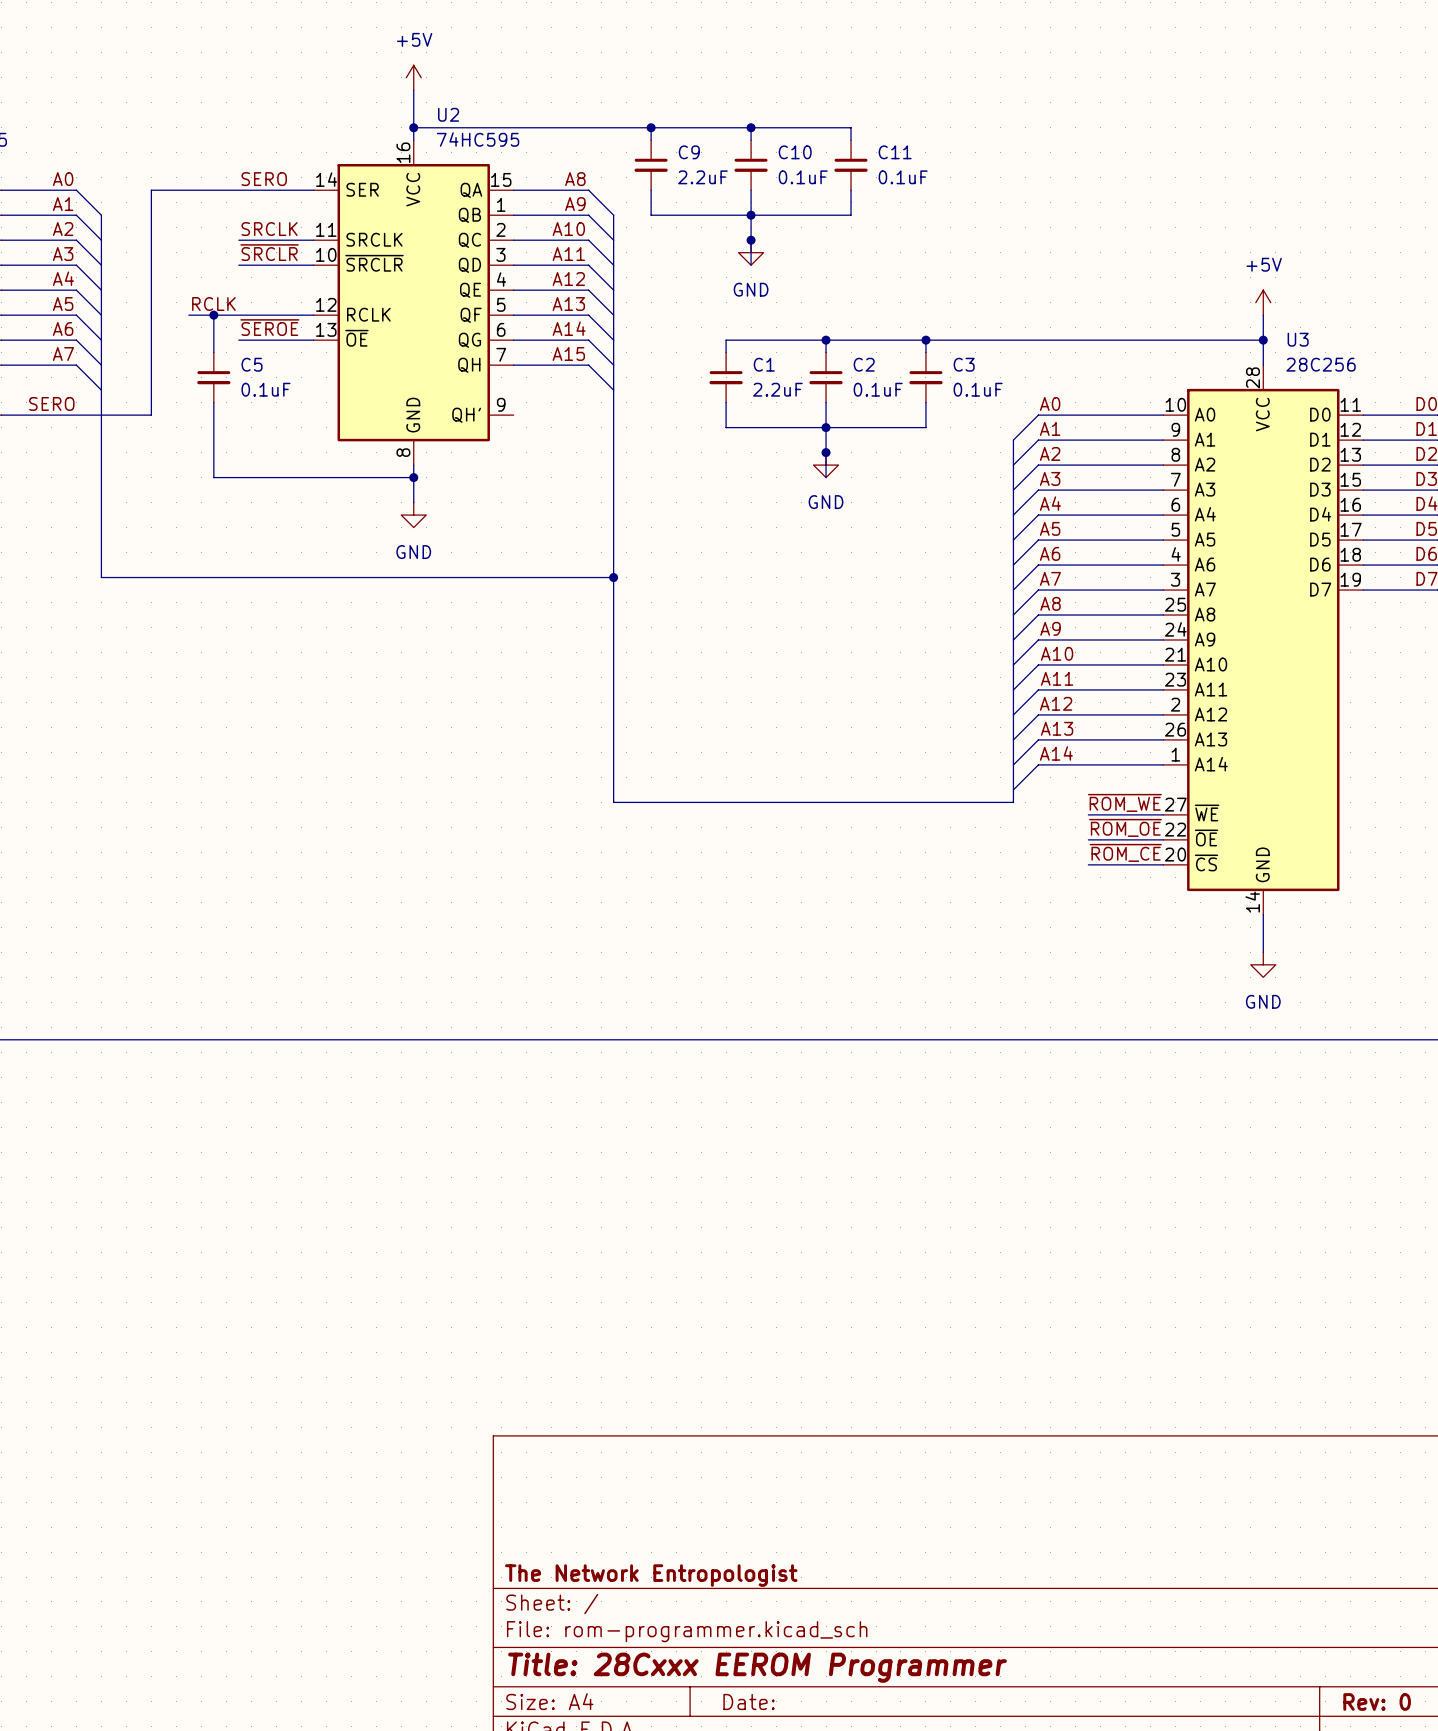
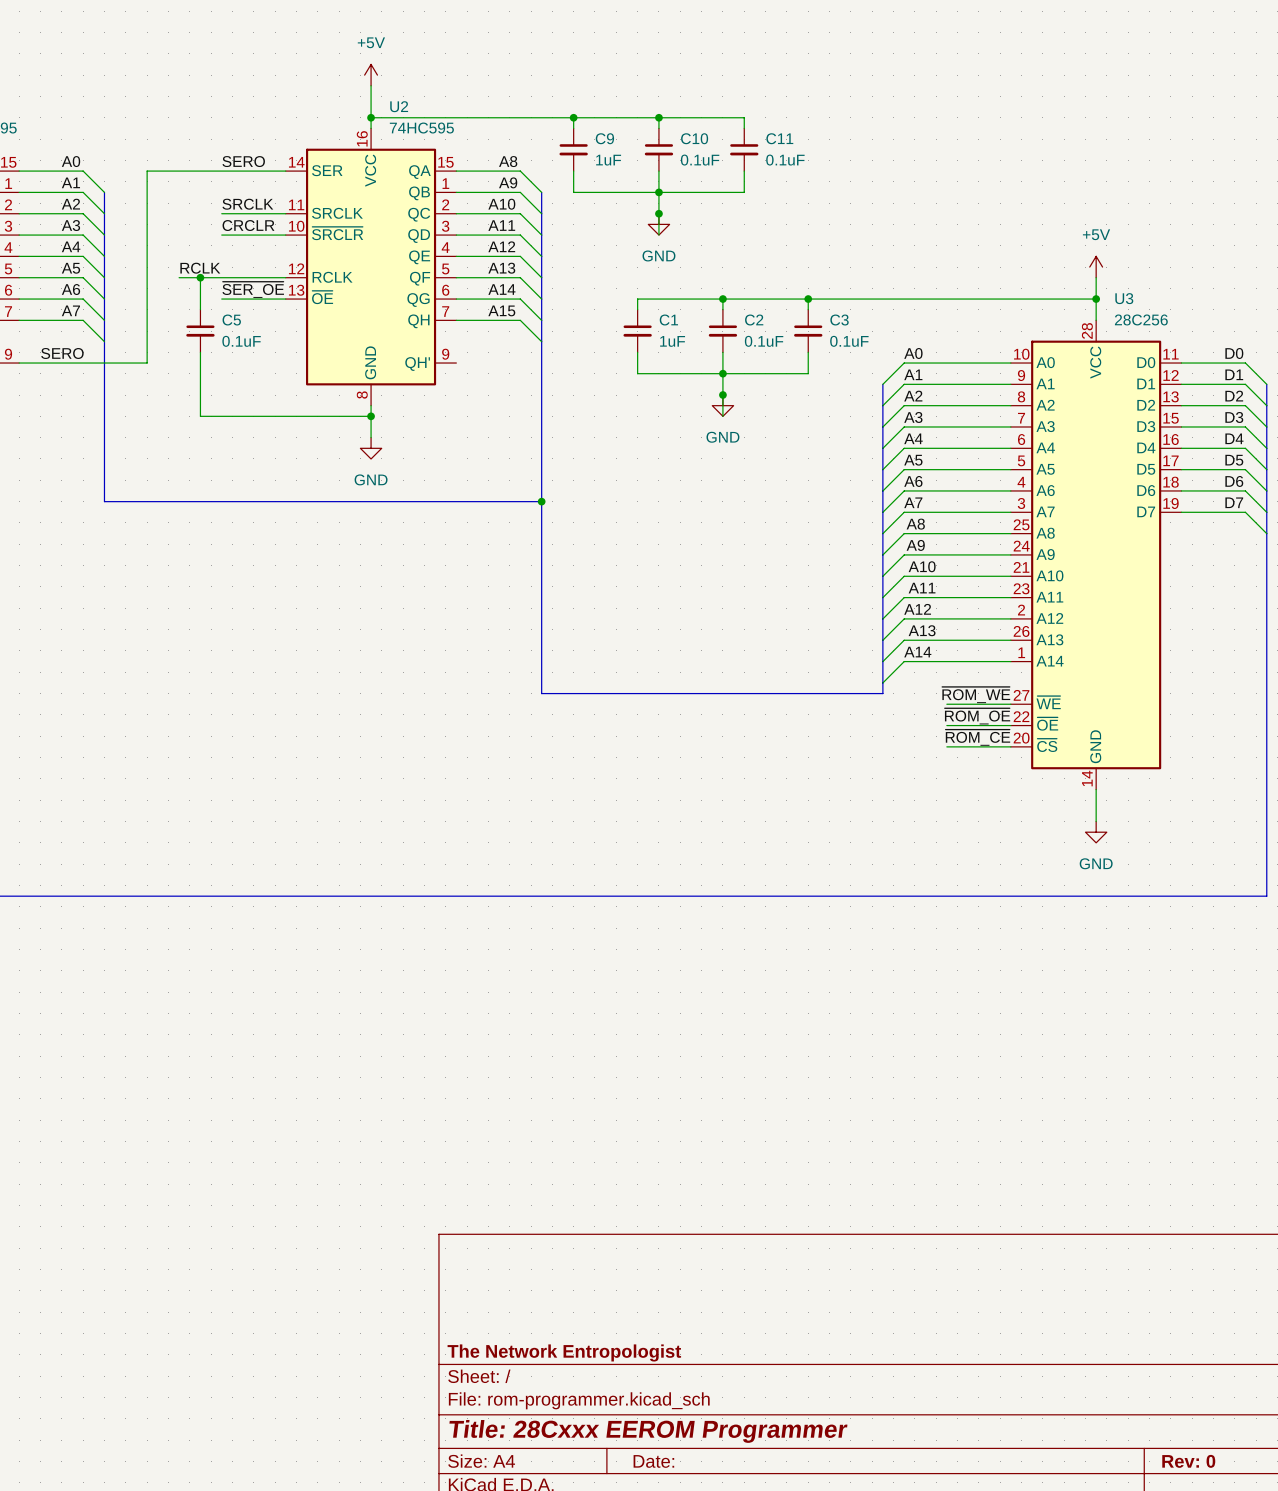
C9 value: 2.2uF (702, 177) -> 1uF (608, 160)
label: ~{SRCLR} (269, 252) -> CRCLR (248, 225)
label: ~{SEROE} (269, 327) -> ~{SER_OE} (253, 289)
C1 value: 2.2uF (777, 389) -> 1uF (672, 341)

